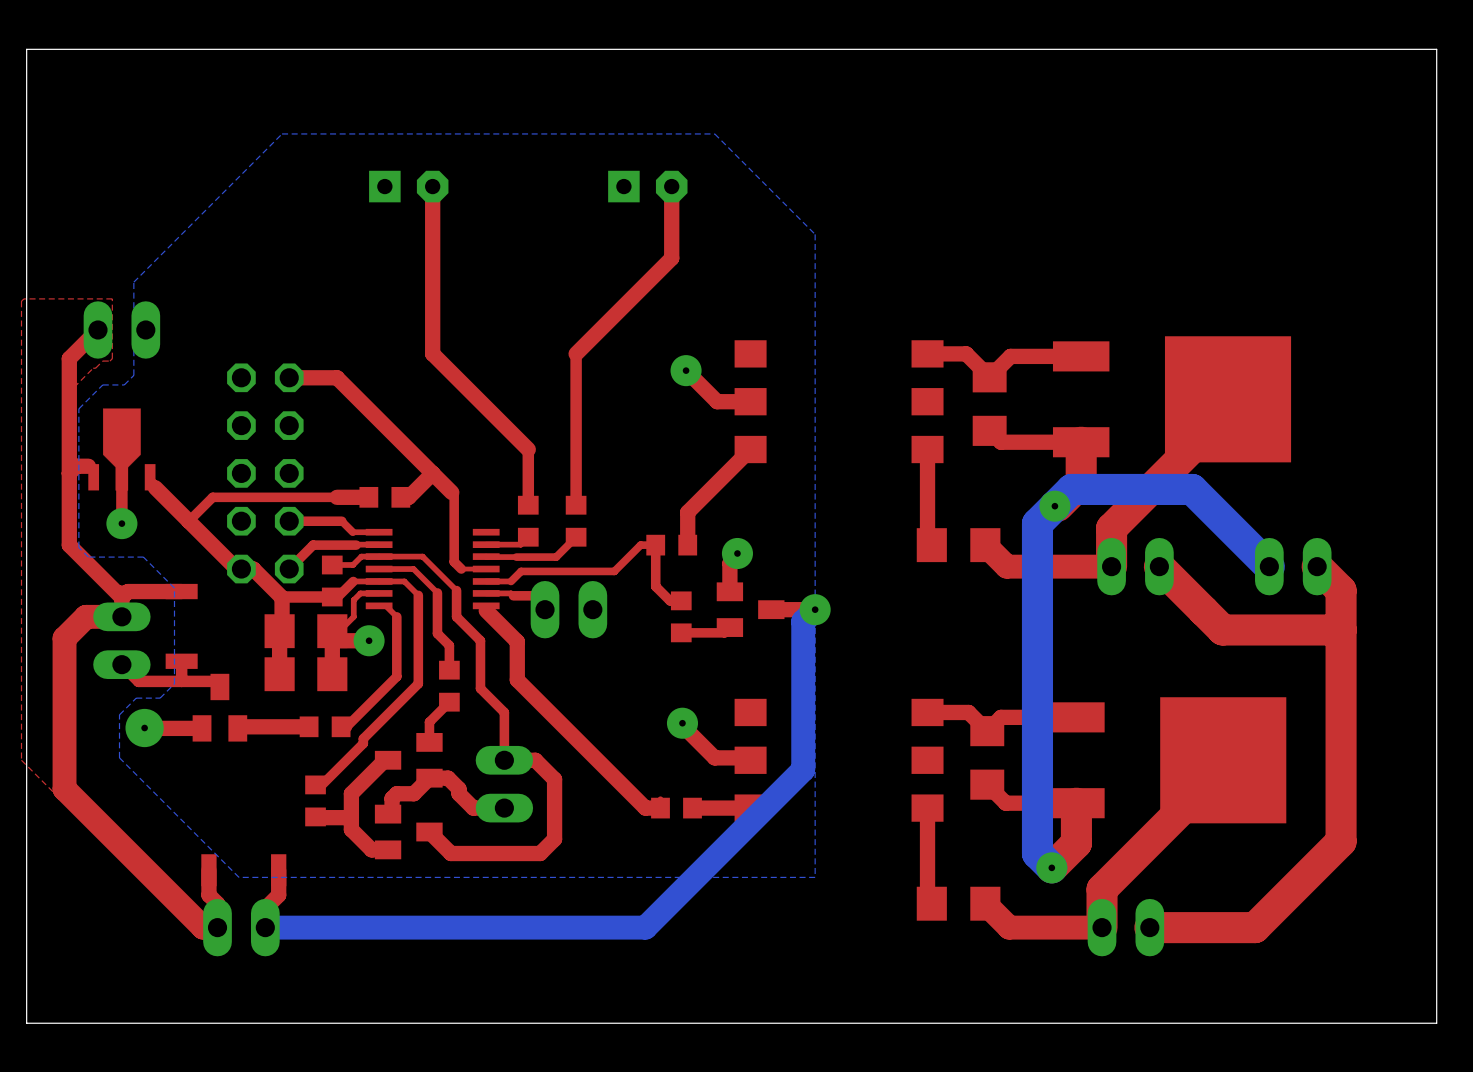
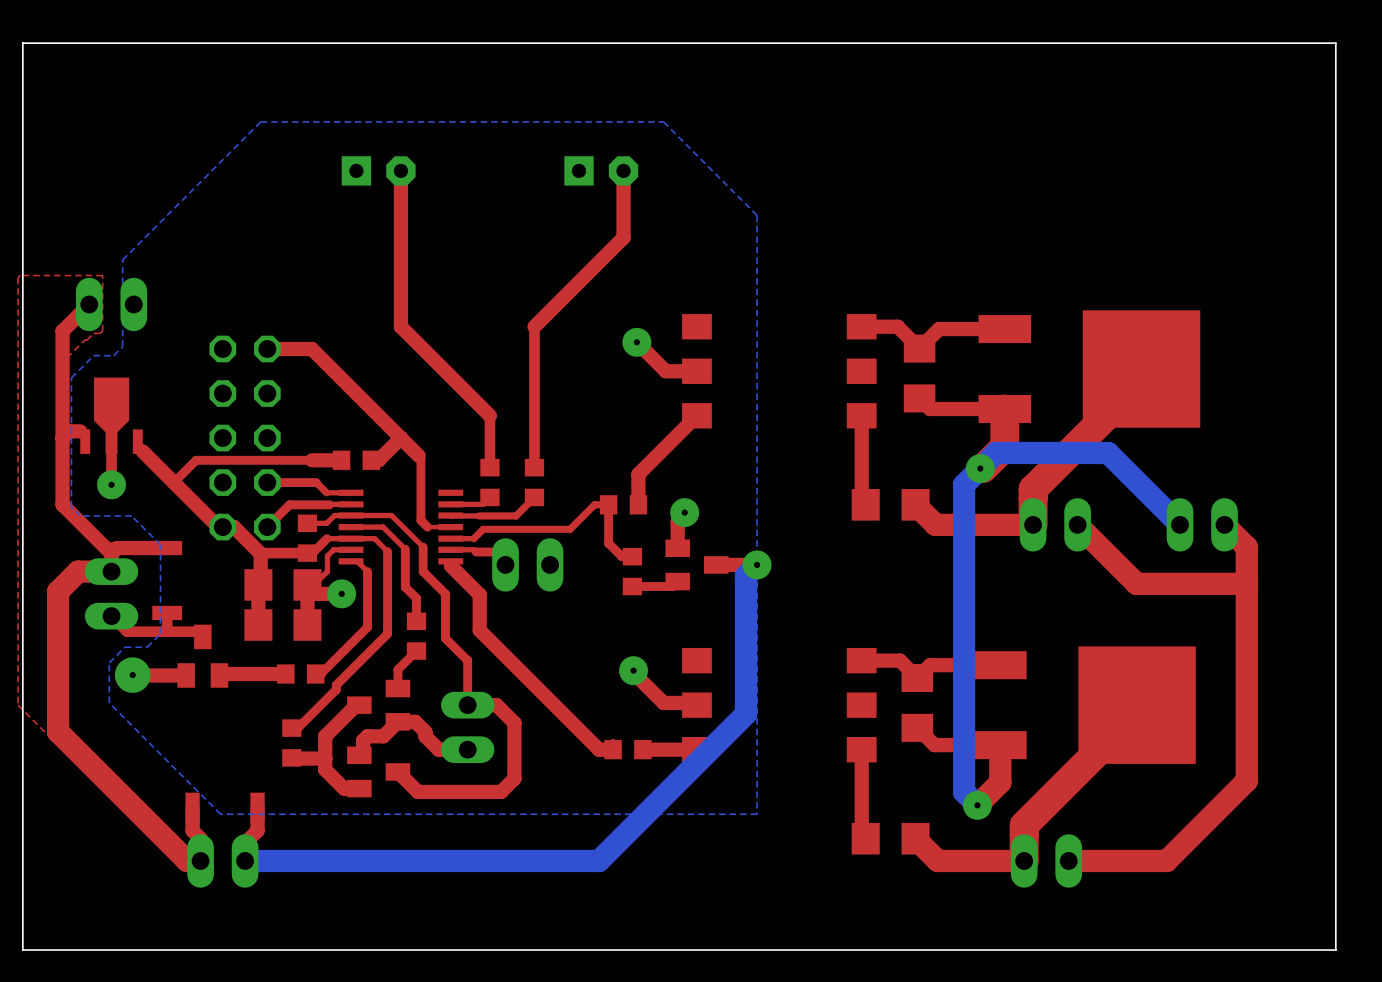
top track width: thick (1159, 566) (1222, 630) (1341, 630) -> thin (1077, 524) (1136, 583) (1246, 583)
bottom track width: thick (1269, 566) (1192, 489) (1071, 489) (1037, 523) (1037, 853) (1051, 867) -> thin (1180, 524) (1108, 452) (995, 452) (964, 484) (964, 791) (977, 805)
top track width: thick (1317, 566) (1341, 590) (1341, 841) (1255, 927) (1149, 927) -> thin (1224, 524) (1246, 547) (1246, 780) (1166, 860) (1068, 860)
top track width: thick (1076, 803) (1076, 843) (1051, 867) -> thin (1000, 745) (1000, 782) (977, 805)

